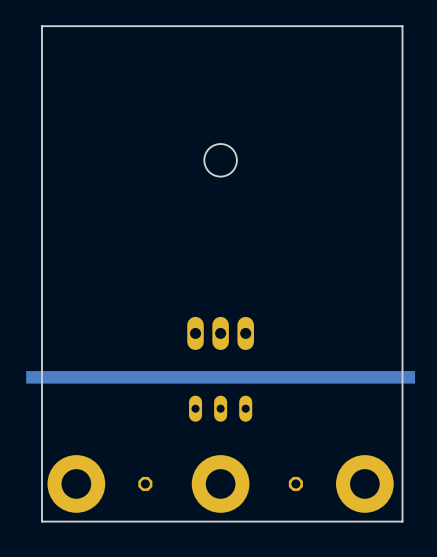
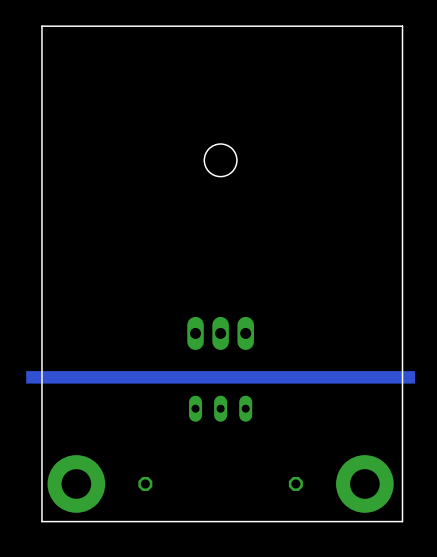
part: (220, 483) -> none

